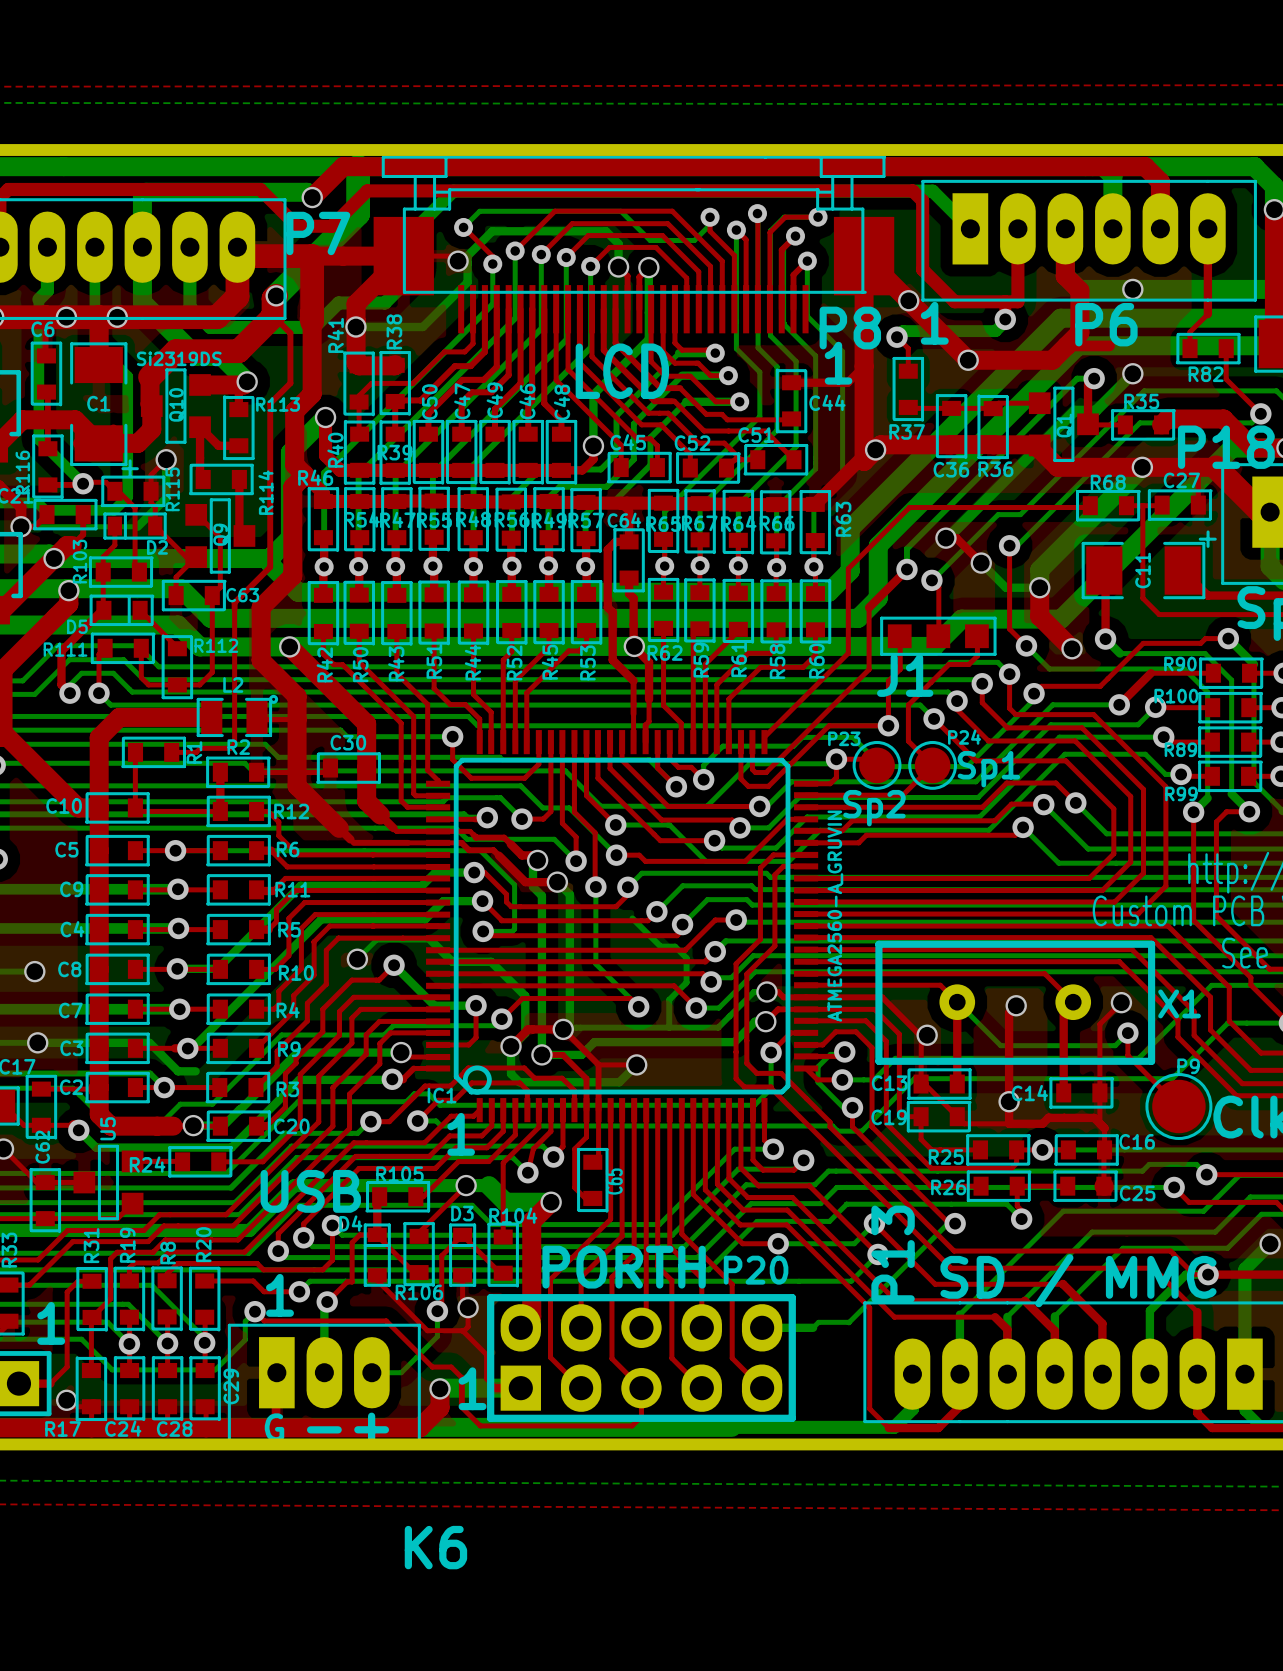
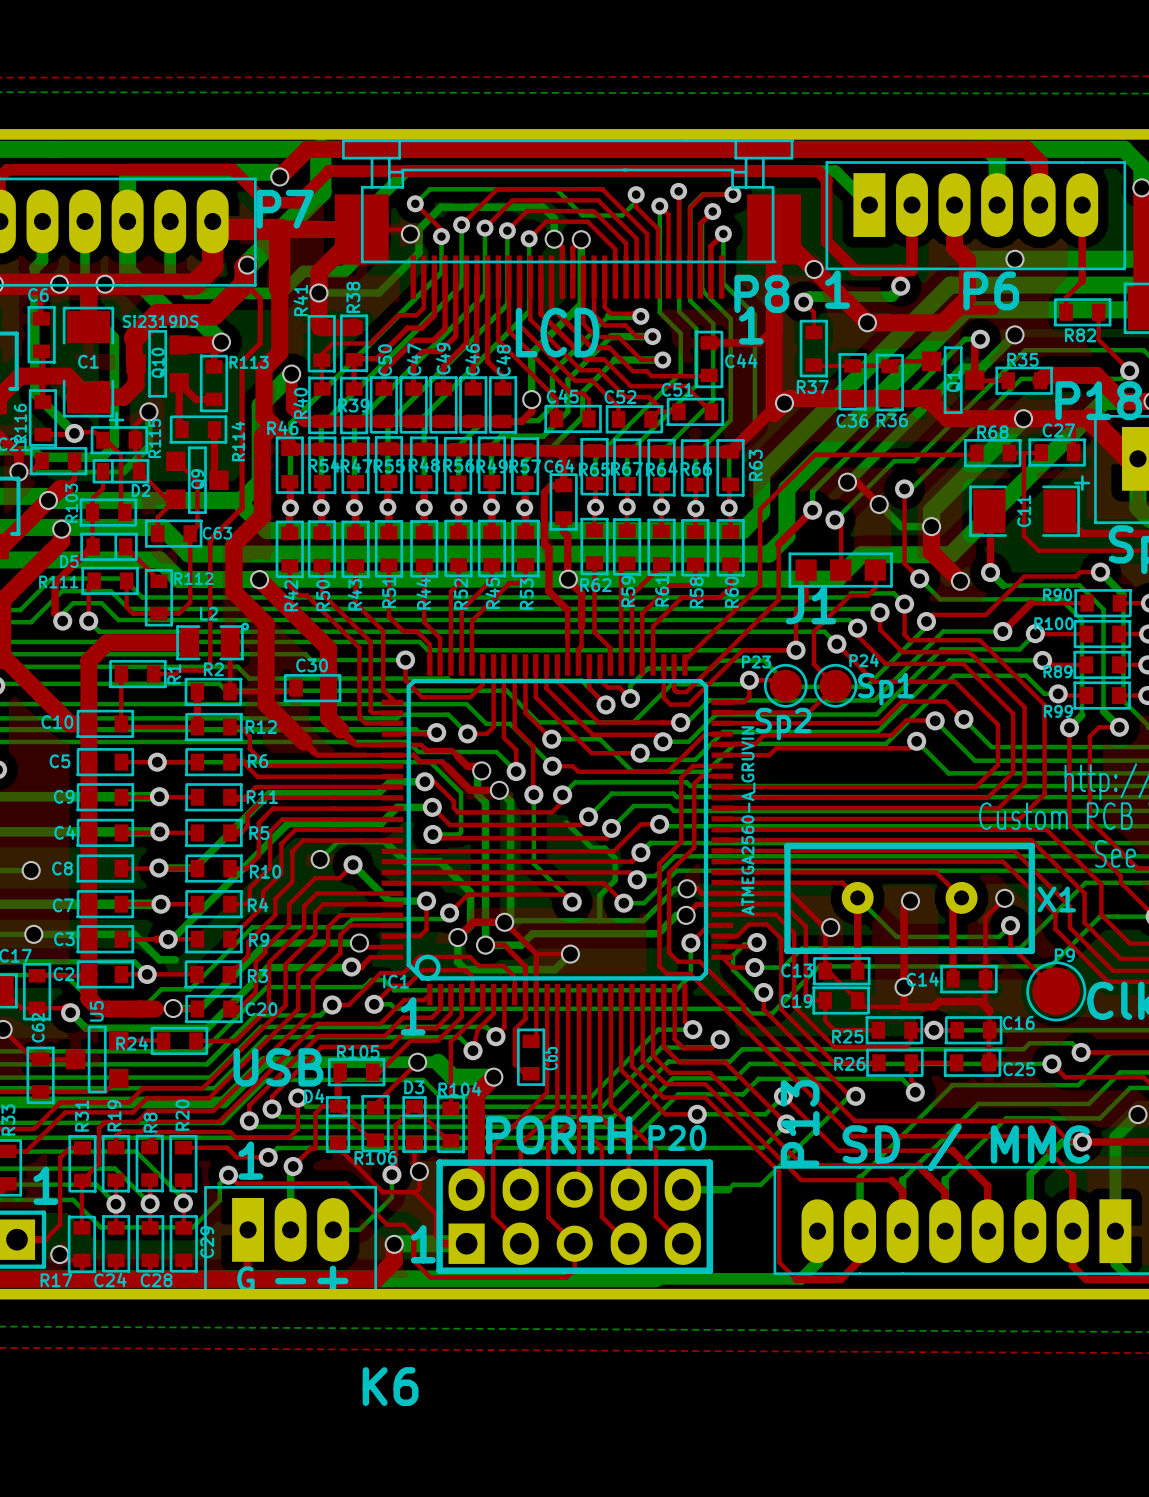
top track: (257, 717) (259, 719) (297, 719) -> (230, 642) (230, 691)

